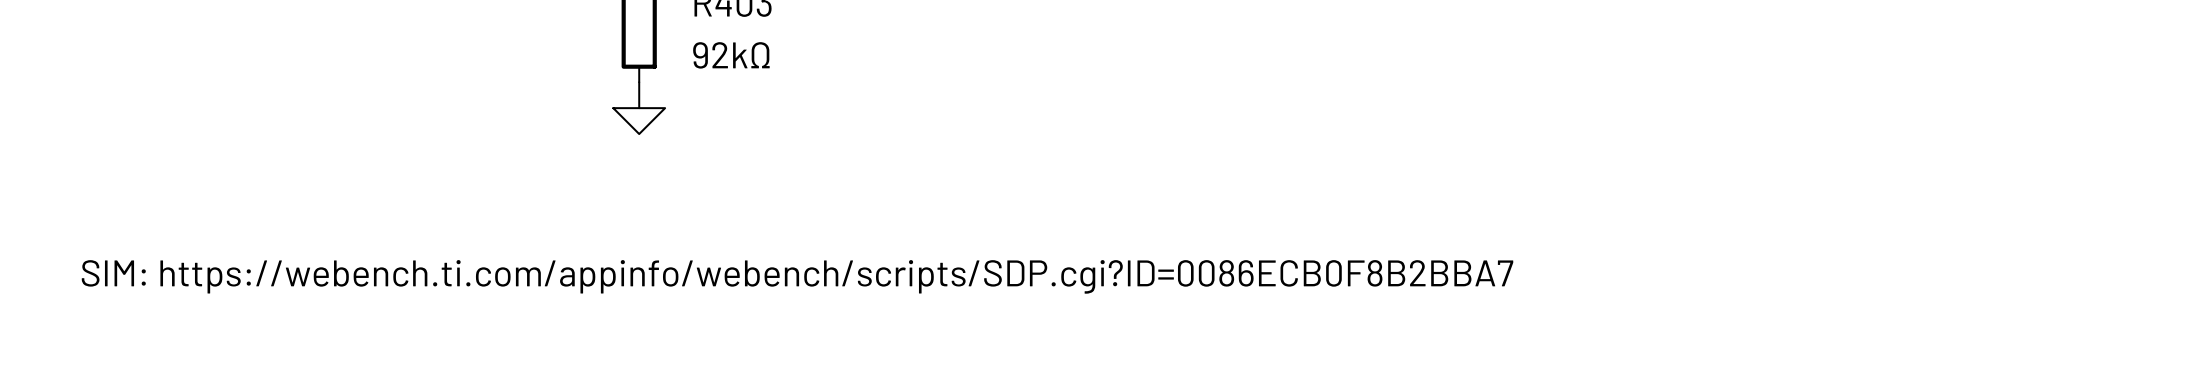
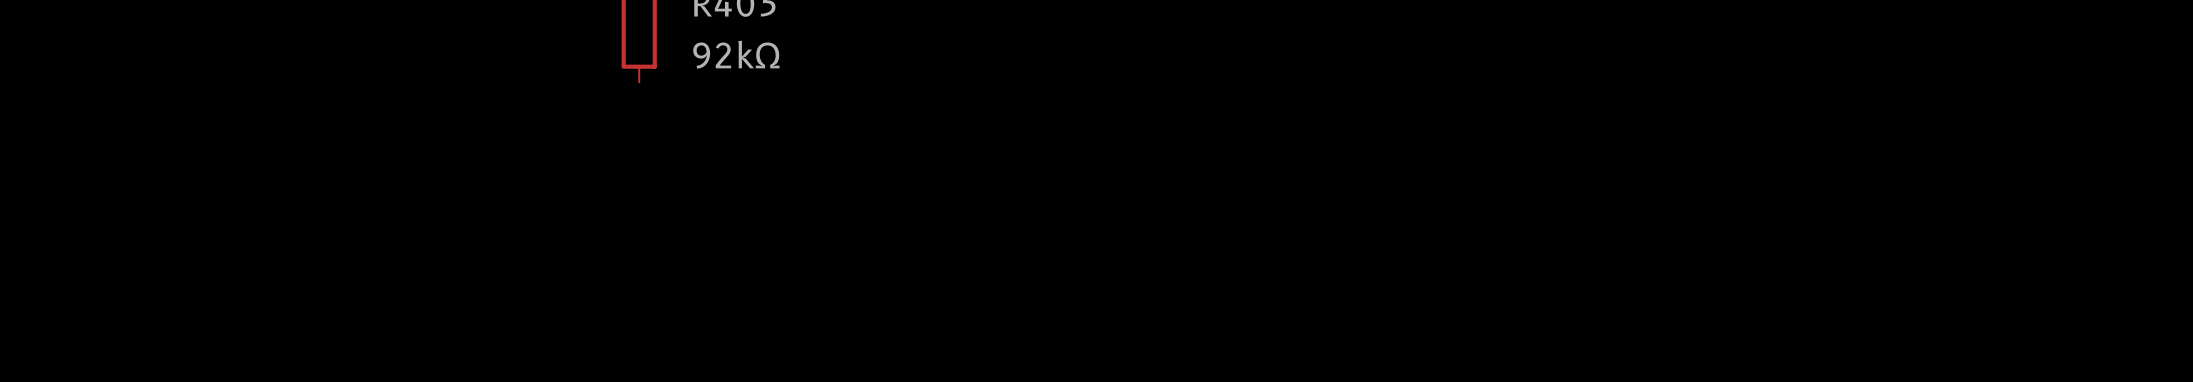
wire: (639, 82) (639, 108) -> none
power symbol: (639, 121) -> none
text: SIM: https://webench.ti.com/appinfo/webench/scripts/SDP.cgi?ID=0086ECB0F8B2BBA7 (797, 276) -> none

